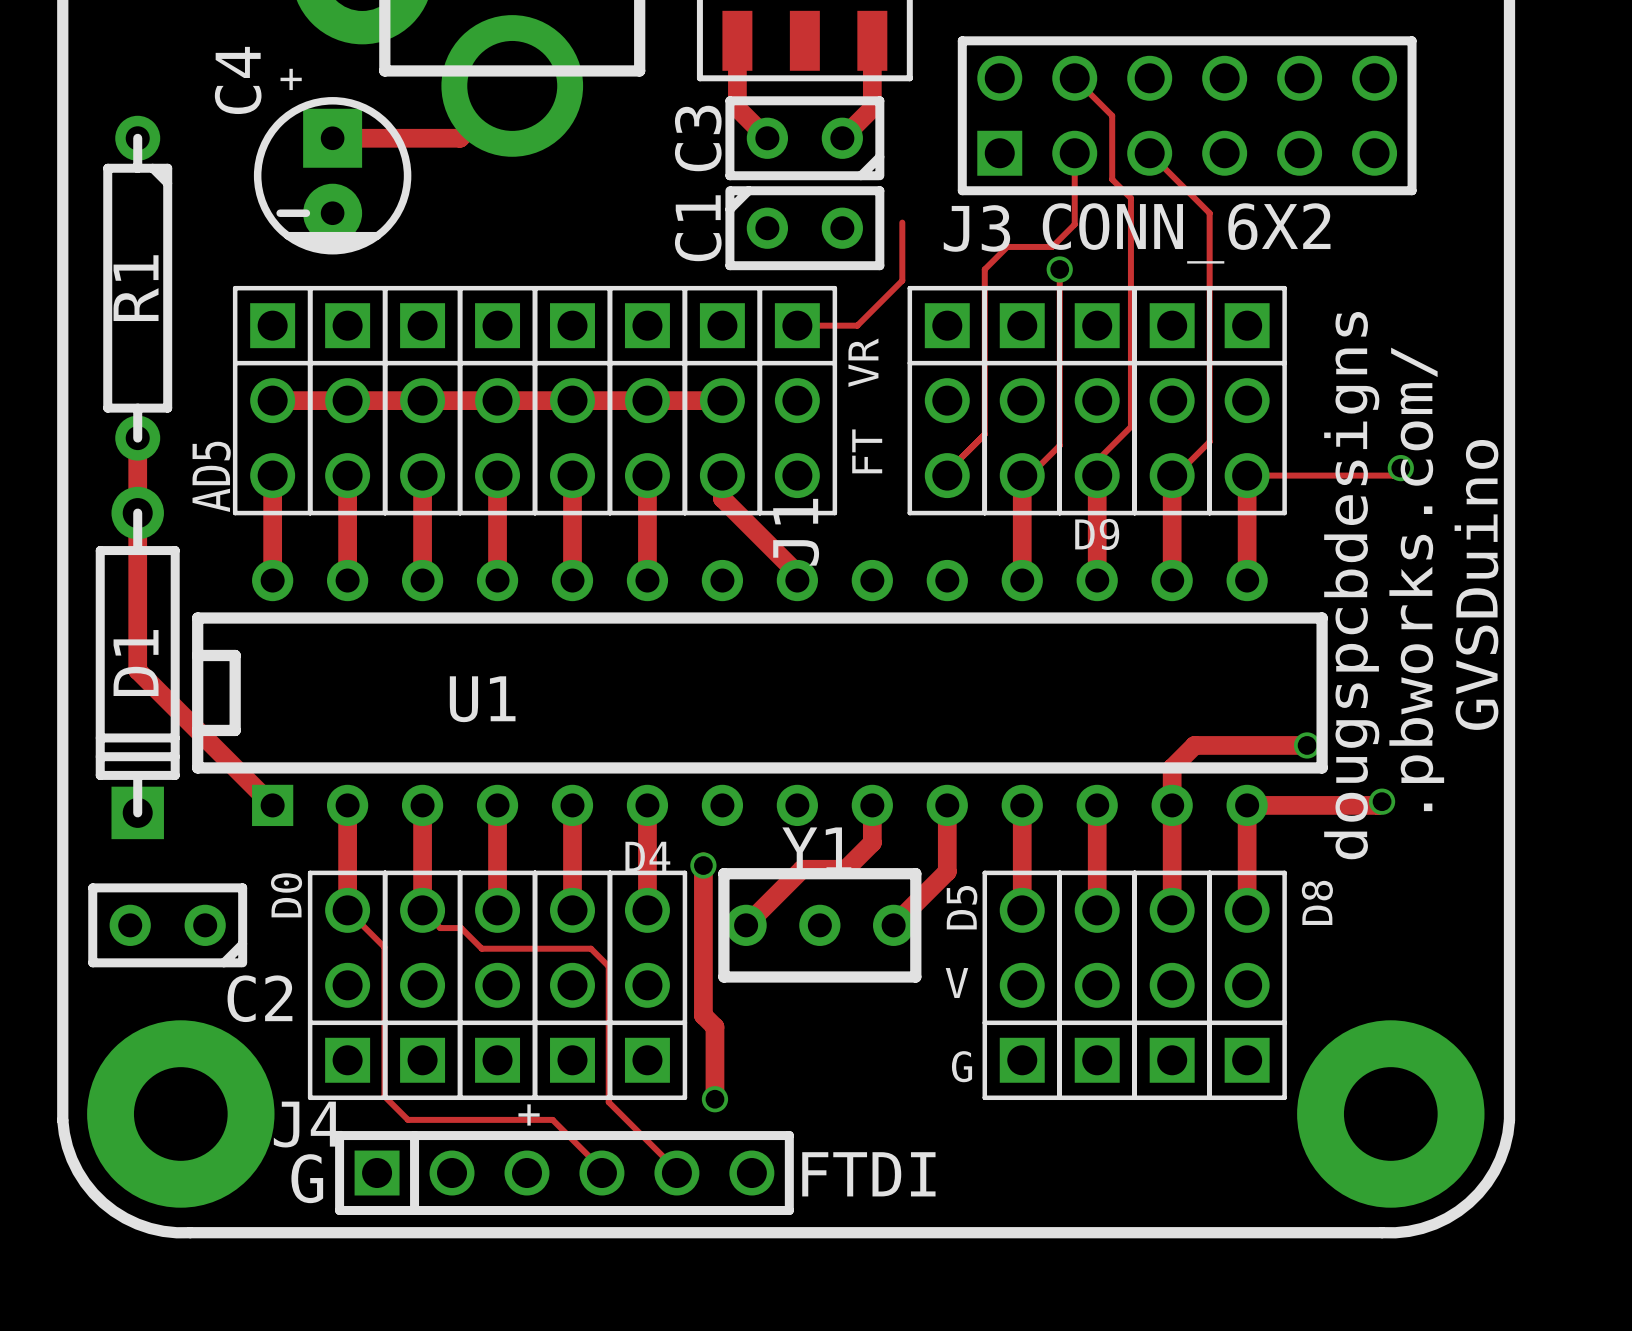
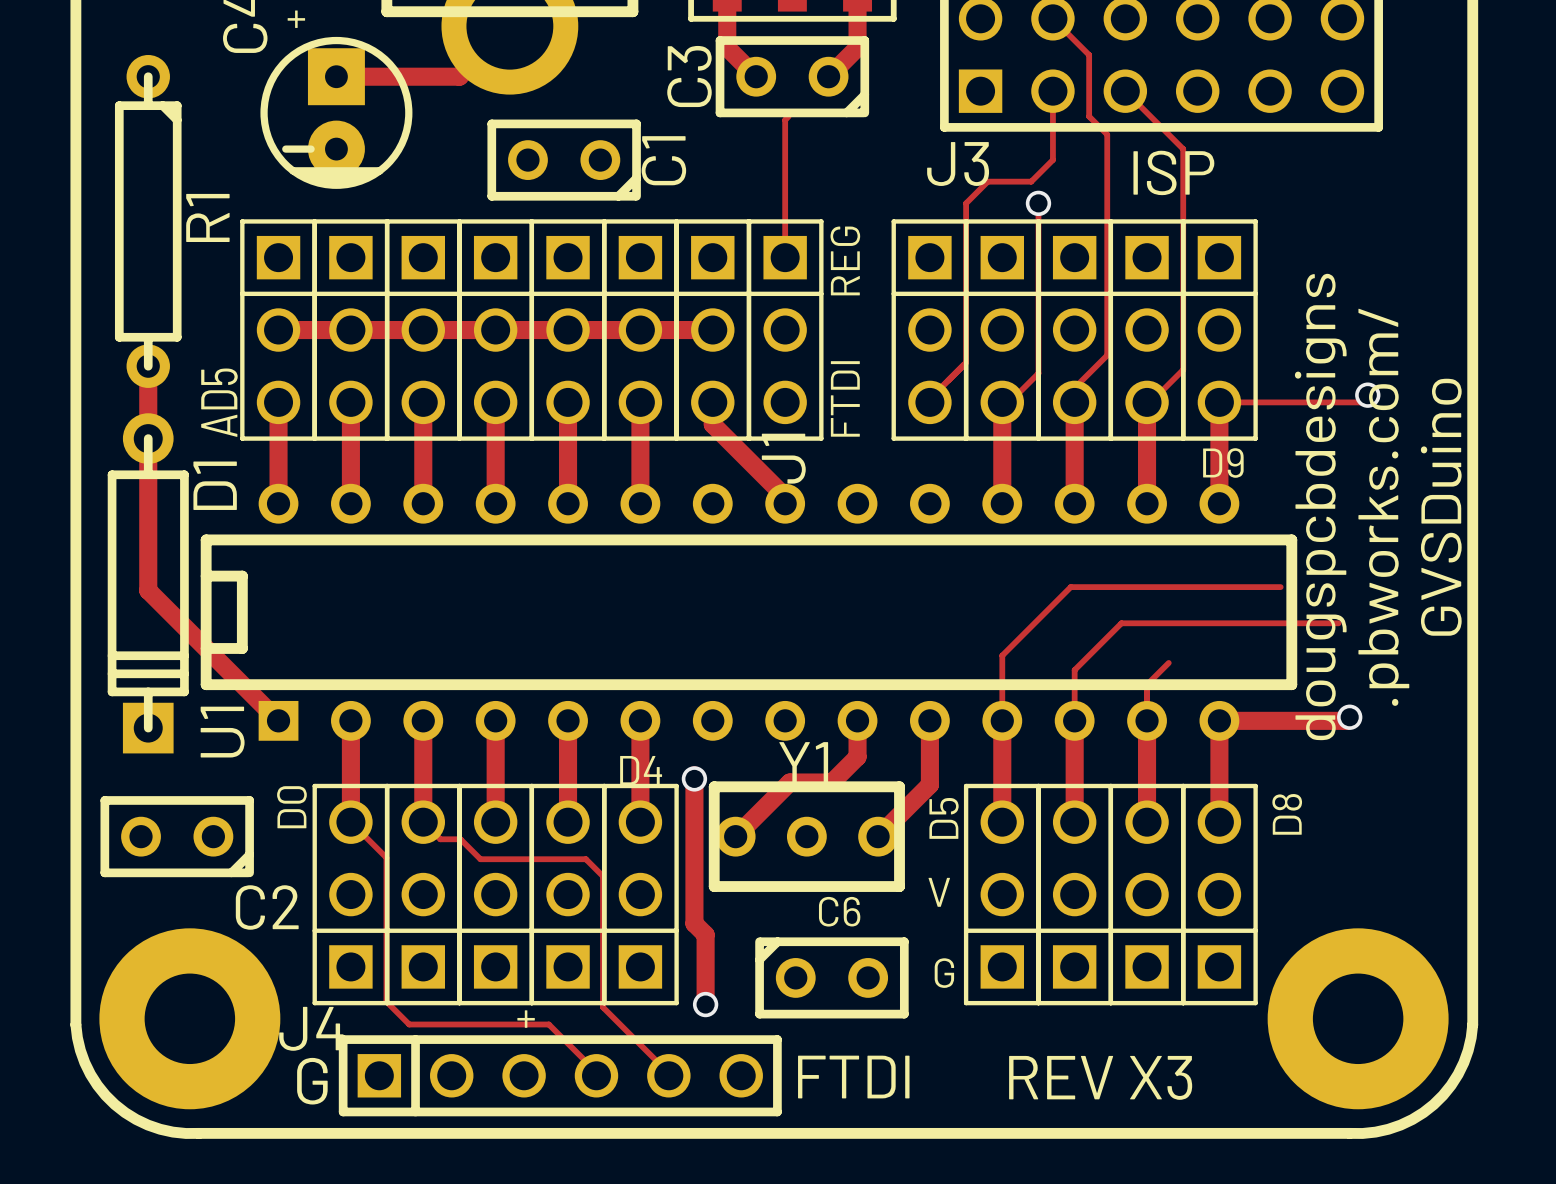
track: (902, 222) (902, 280) (857, 325) (797, 325) -> (788, 116) (785, 120) (785, 257)
C1 rotation: 0° (804, 228) -> 180° (564, 160)
C1 position: (804, 228) -> (564, 160)
J3 value: CONN_6X2 (1186, 233) -> none
text: none -> ISP (1173, 172)
R1 name position: R1 (136, 288) -> R1 (207, 217)
text: none -> REG (845, 260)
text: VR (863, 362) -> none
text: FT (867, 451) -> FTDI (845, 398)
text position: D9 (1097, 534) -> D9 (1223, 463)
D1 name position: D1 (136, 663) -> D1 (215, 485)
track: none -> (1280, 587) (1070, 587) (1002, 655) (1002, 720)
U1 name rotation: 0° (482, 699) -> 90° counterclockwise (222, 732)
U1 name position: U1 (482, 699) -> U1 (222, 732)
track: none -> (1338, 623) (1121, 623) (1074, 670) (1074, 720)
track: (1307, 745) (1194, 745) (1172, 767) (1172, 805) -> none
via: (1307, 745) -> none
C6: none -> (831, 977)
text: none -> REV X3 (1100, 1077)

